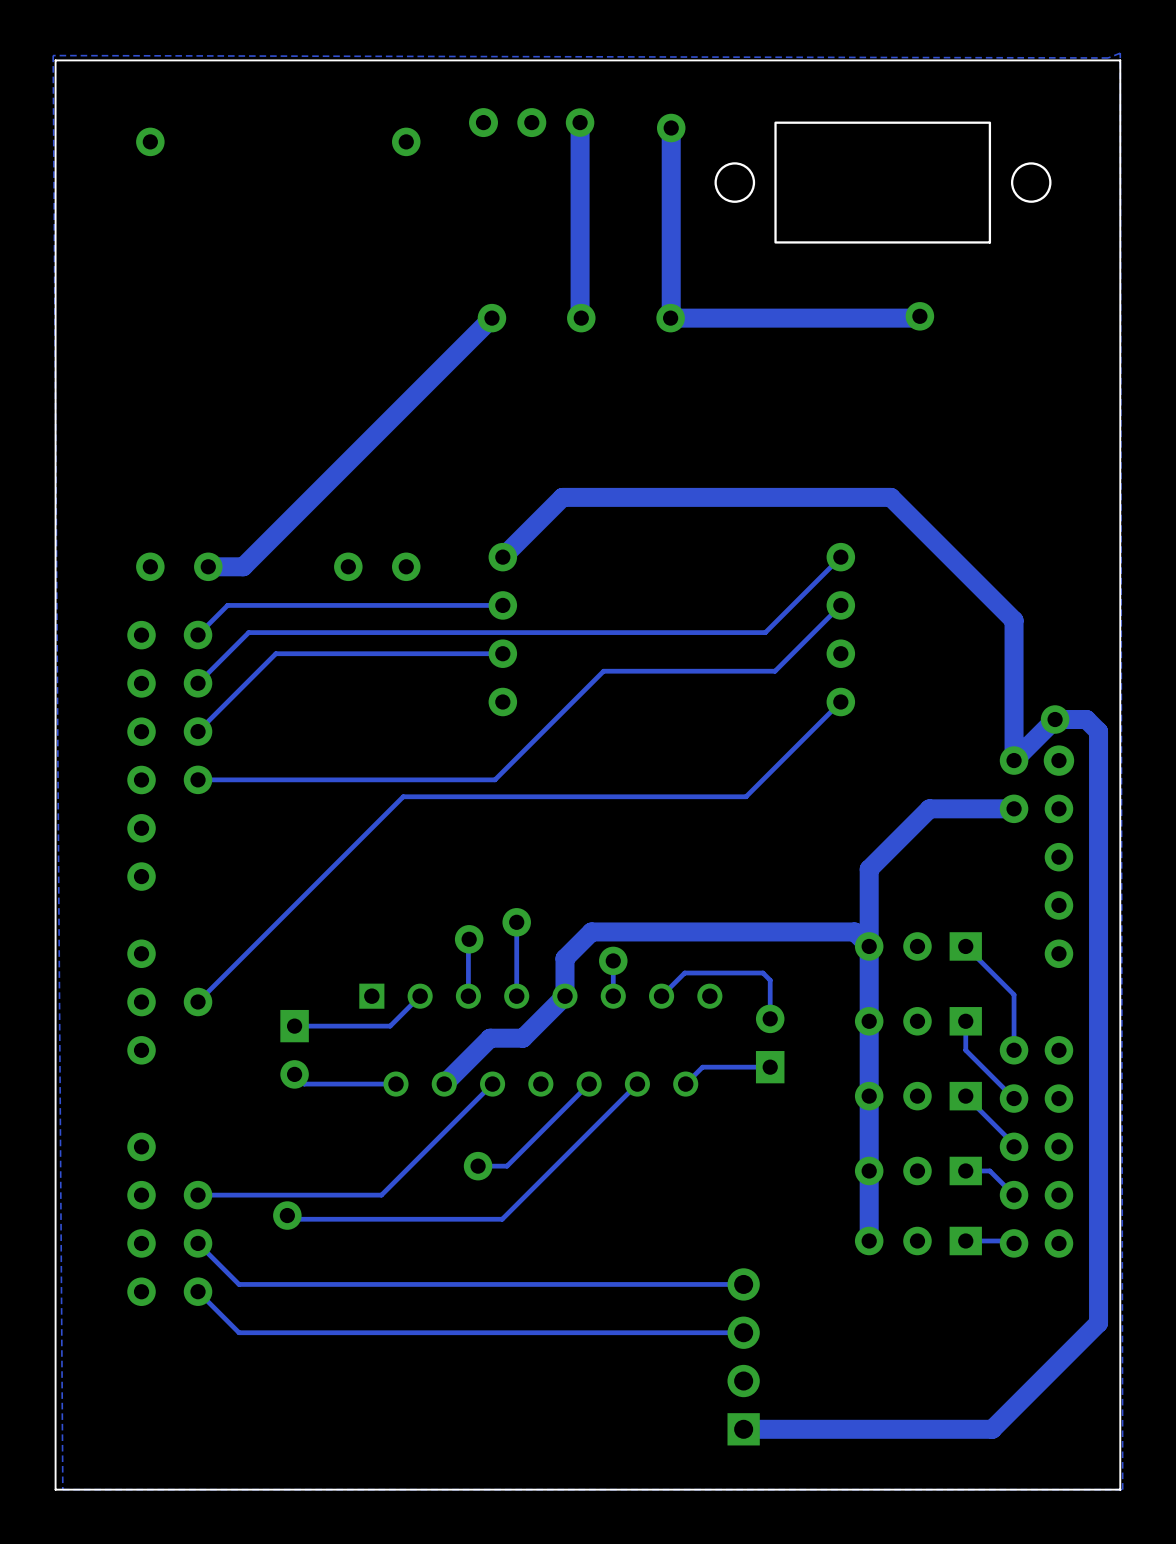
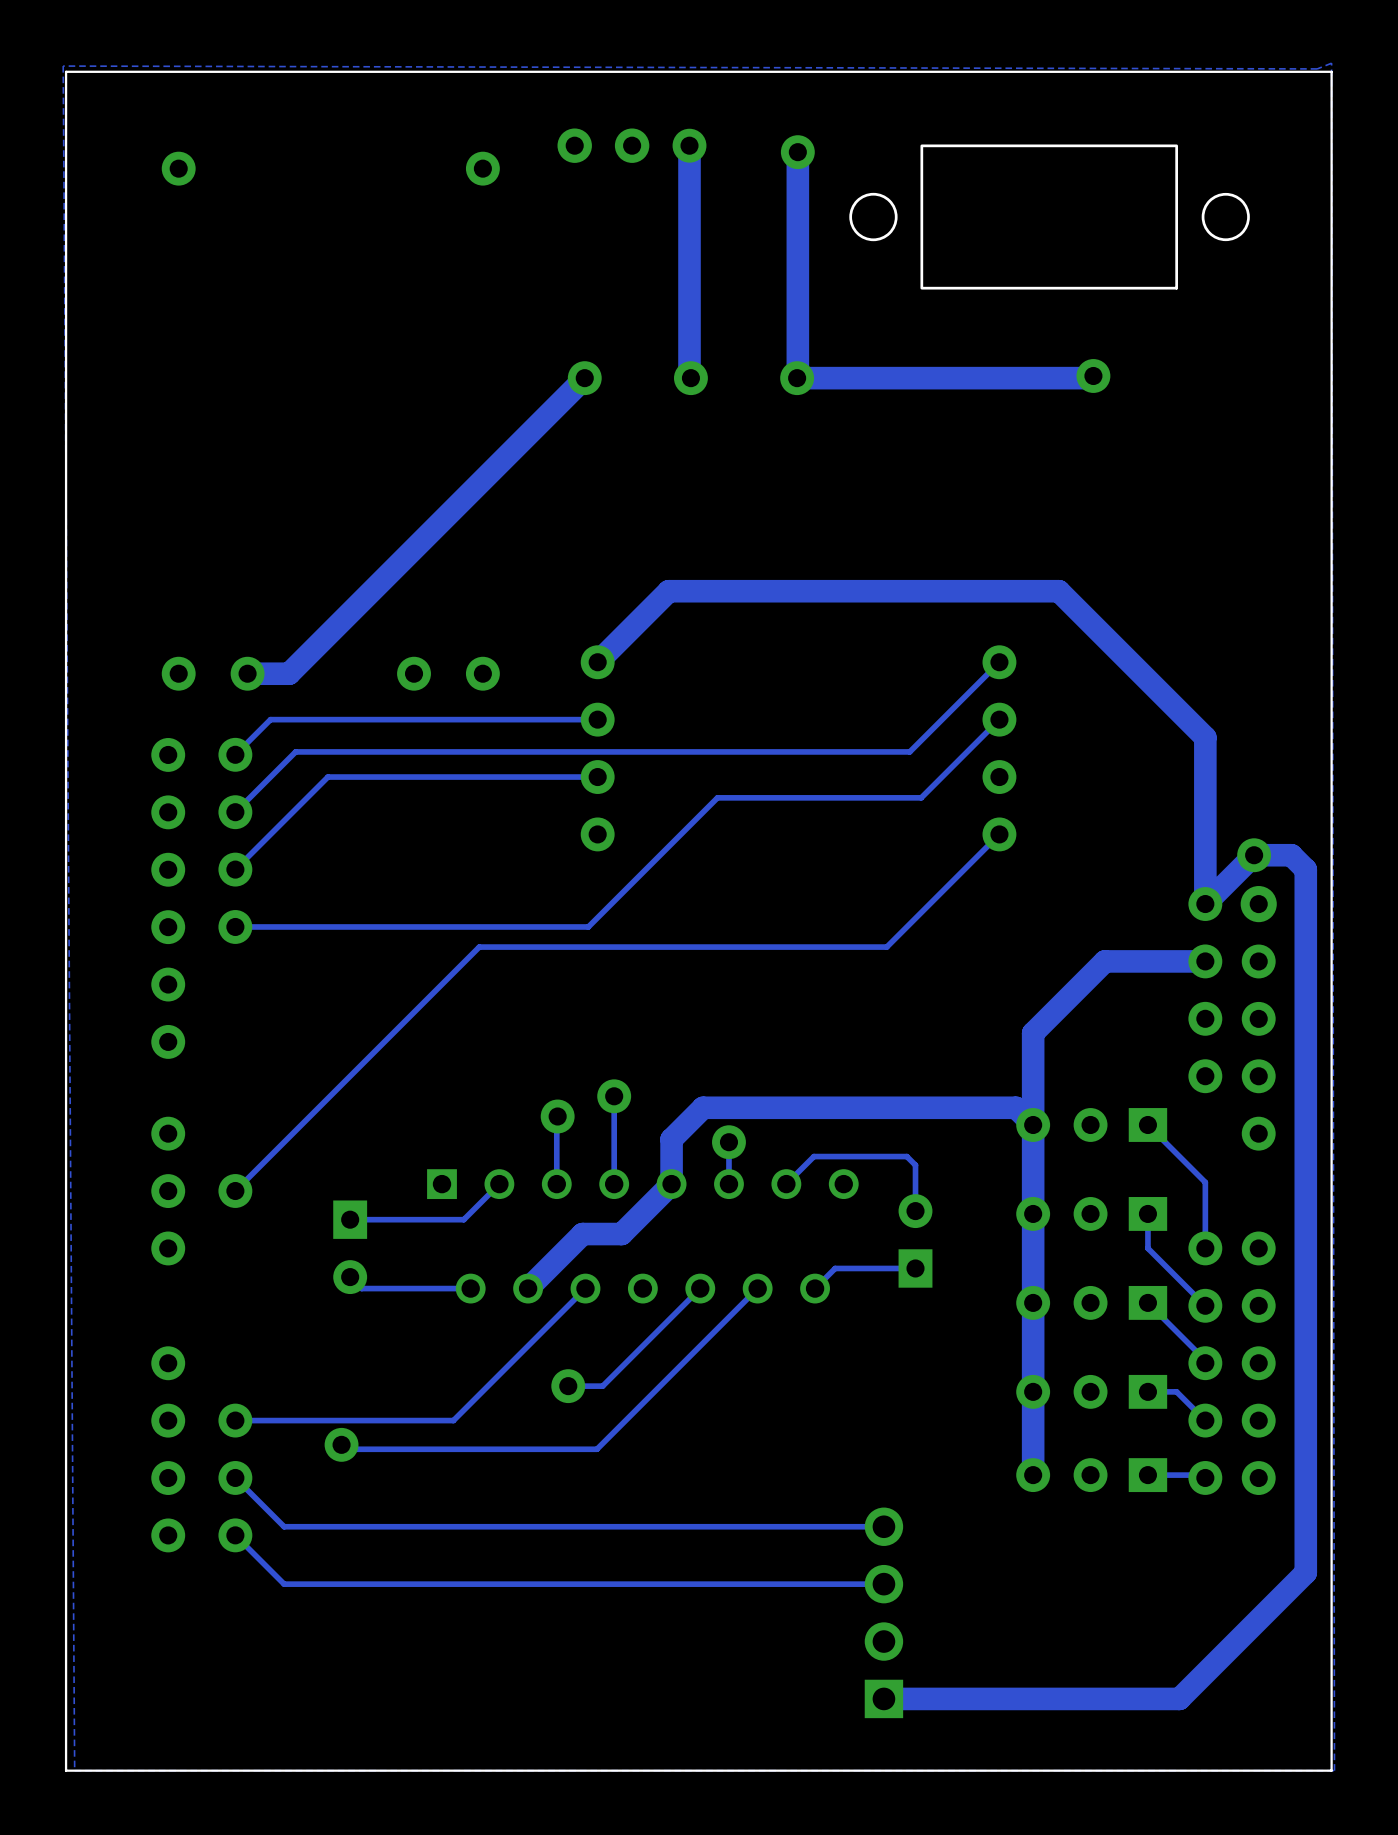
via: none -> (1205, 1018)
via: none -> (1205, 1076)

